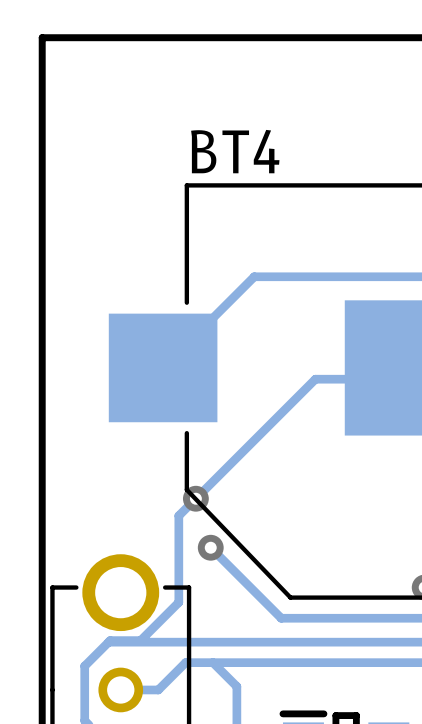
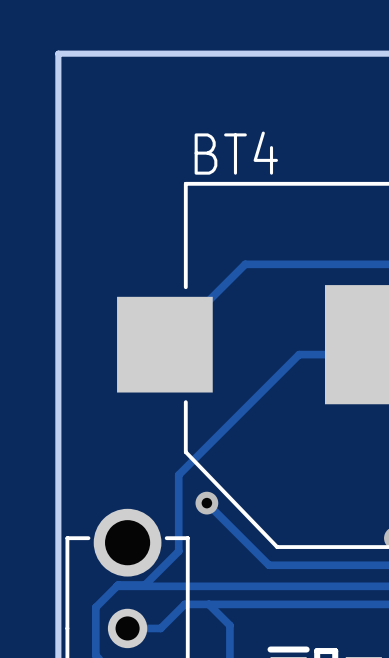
via: (195, 498) -> none

